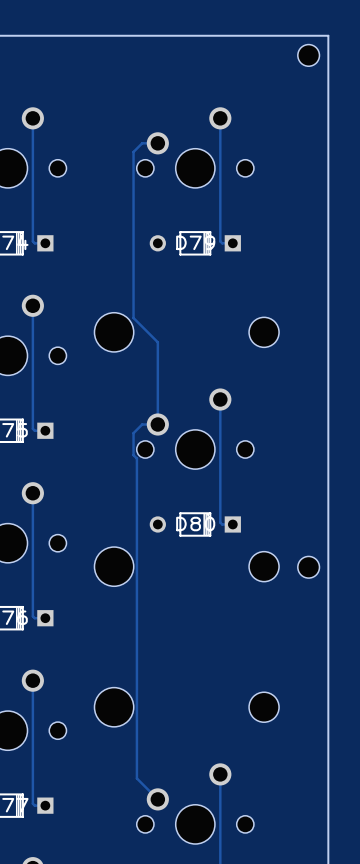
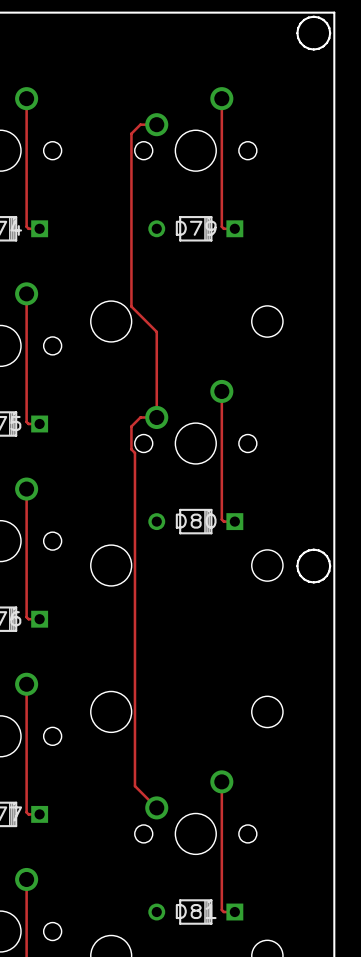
board edge: none -> (313, 16) (304, 19) (298, 28) (297, 33) (298, 38) (304, 46) (313, 49) (318, 48) (327, 42) (330, 33) (327, 23) (318, 17) (313, 16)
part: (308, 55) -> none
board edge: none -> (313, 549) (304, 552) (300, 556) (297, 566) (298, 571) (304, 579) (313, 582) (318, 581) (327, 575) (330, 566) (327, 556) (318, 550) (313, 549)
part: (308, 567) -> none

